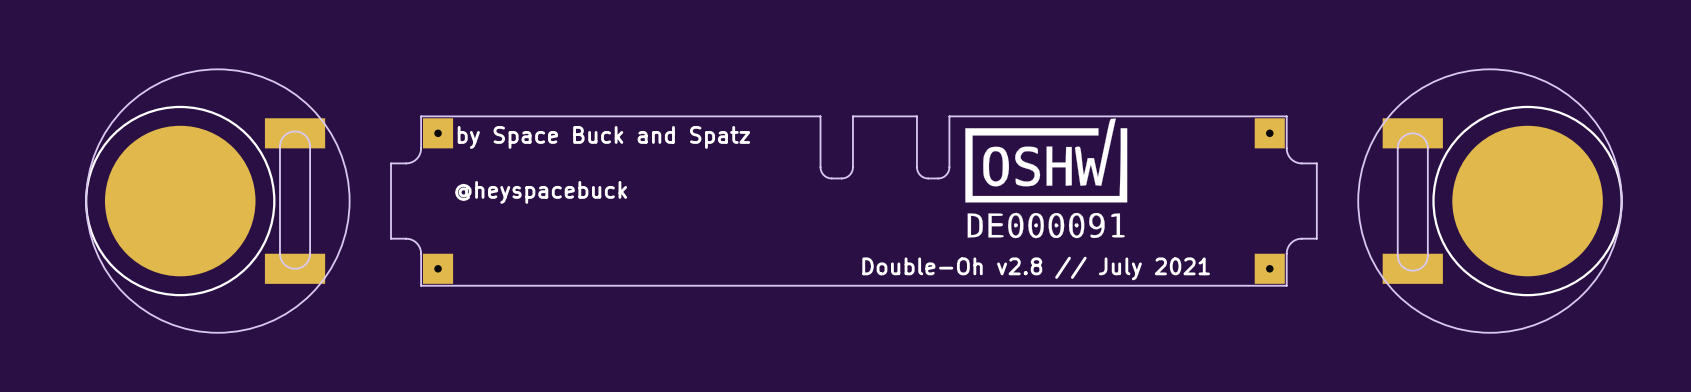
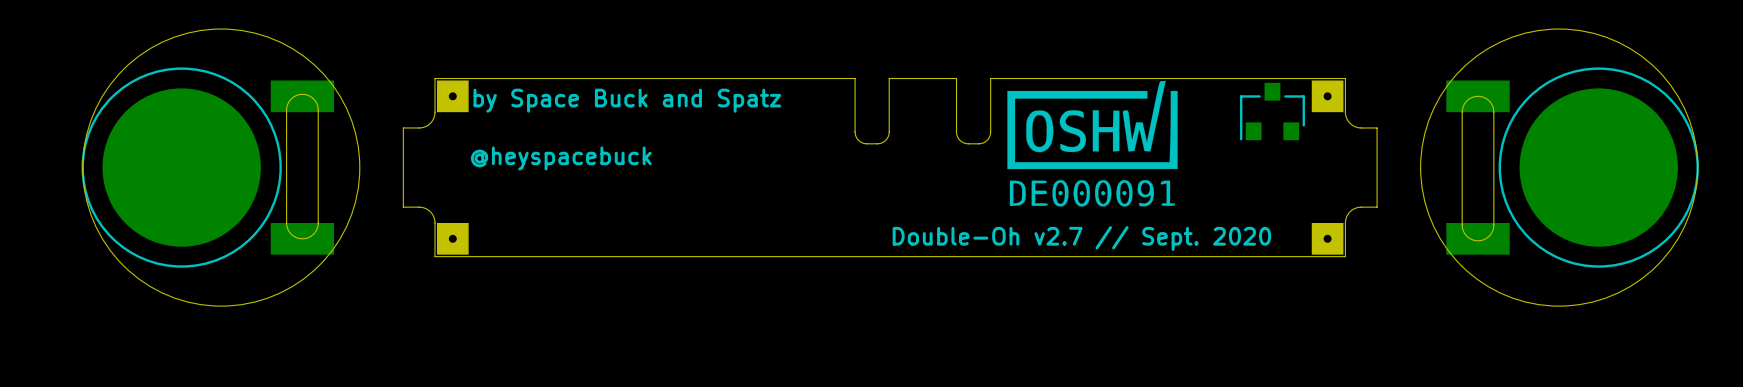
part: none -> (1272, 111)
text: Double-Oh v2.8 // July 2021 (1036, 268) -> Double-Oh v2.7 // Sept. 2020 (1081, 238)

